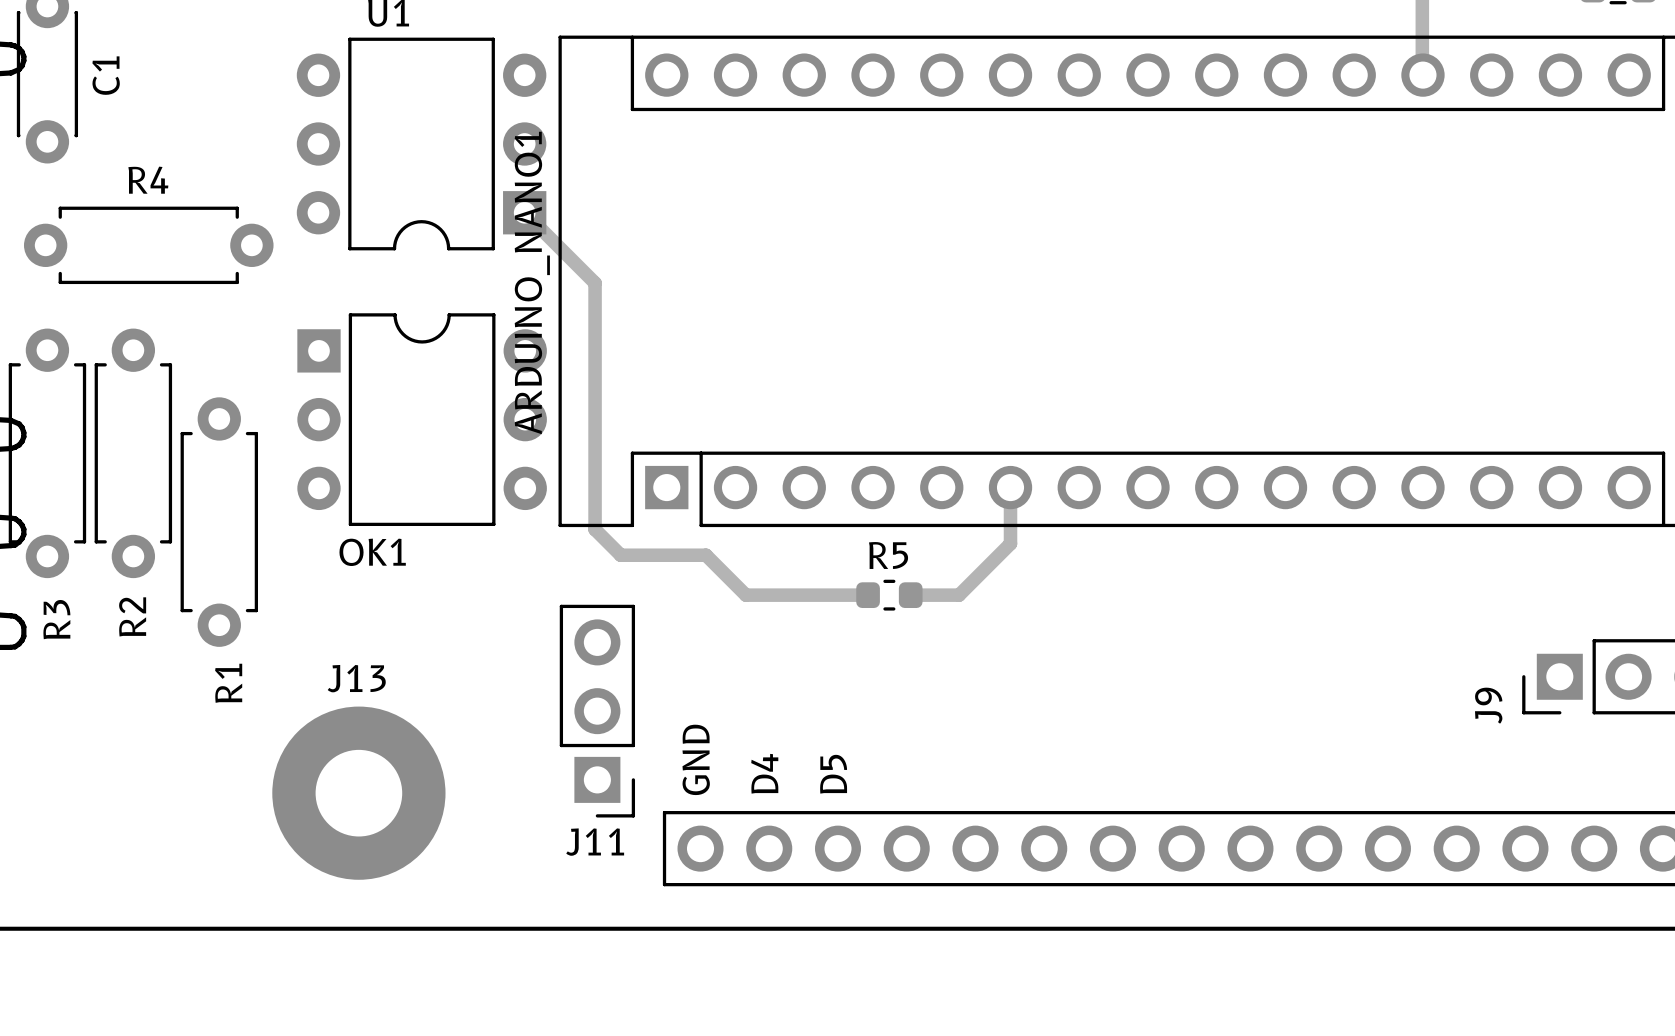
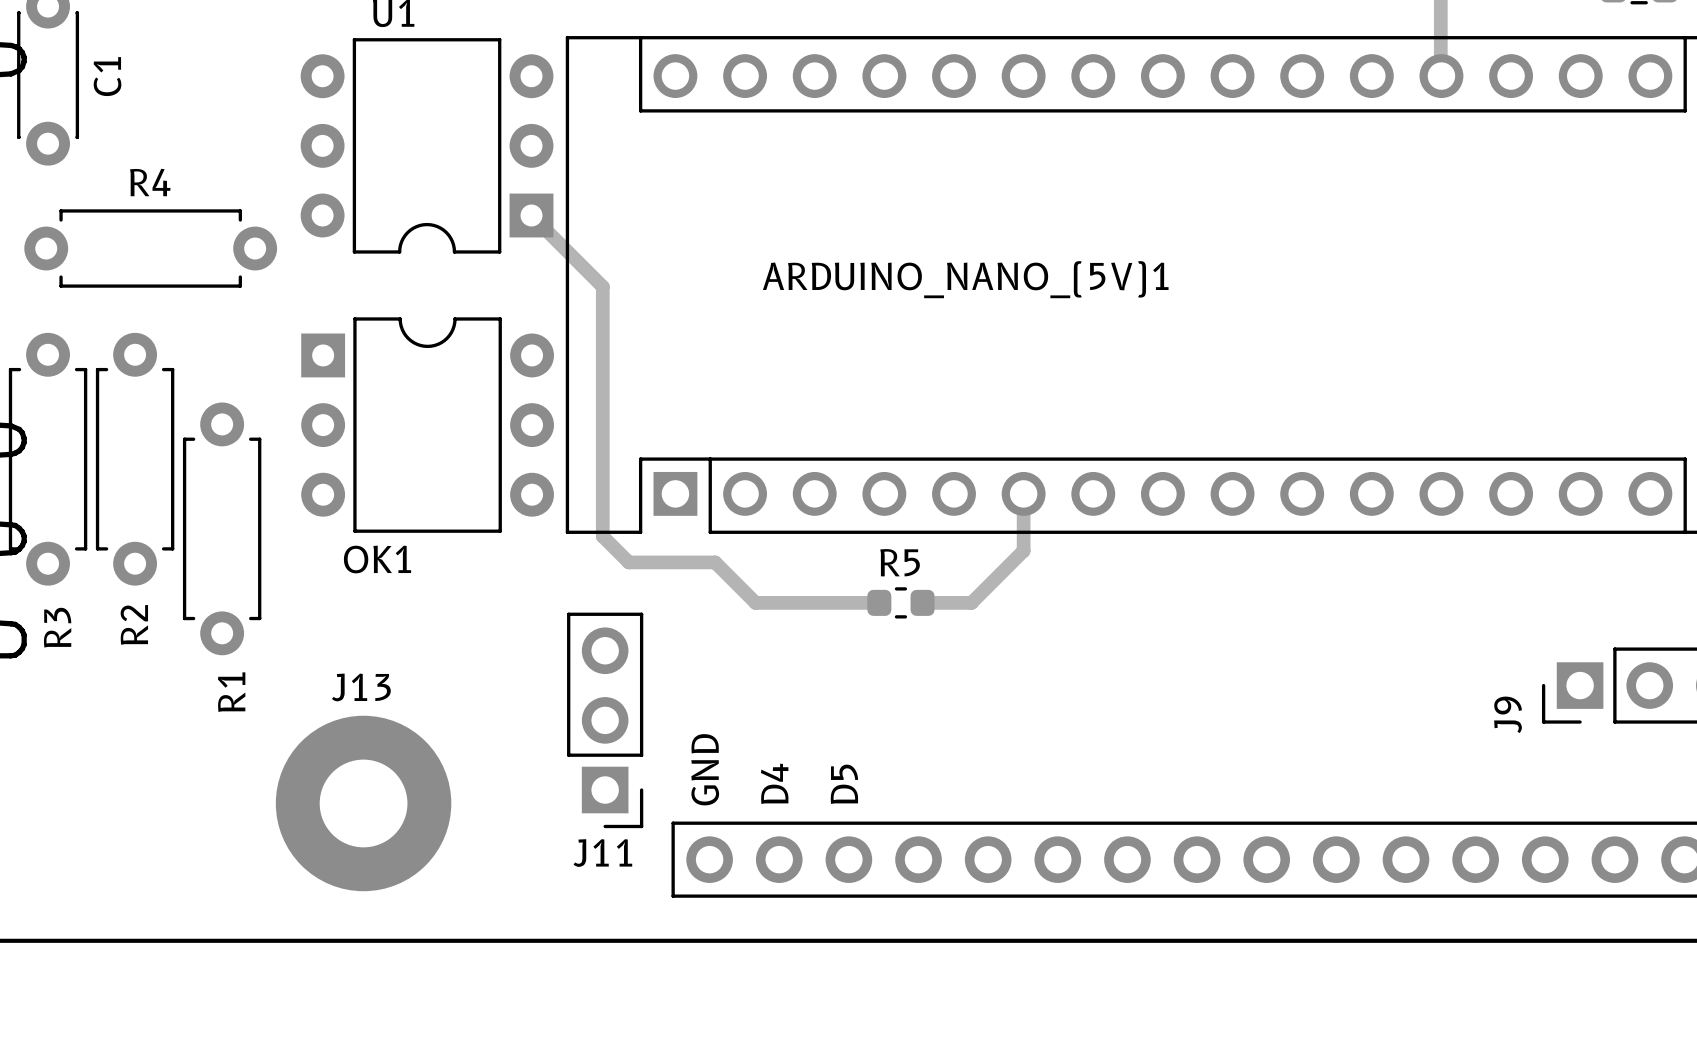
ARDUINO_NANO1 name: ARDUINO_NANO1 (532, 283) -> ARDUINO_NANO_(5V)1 (965, 279)

